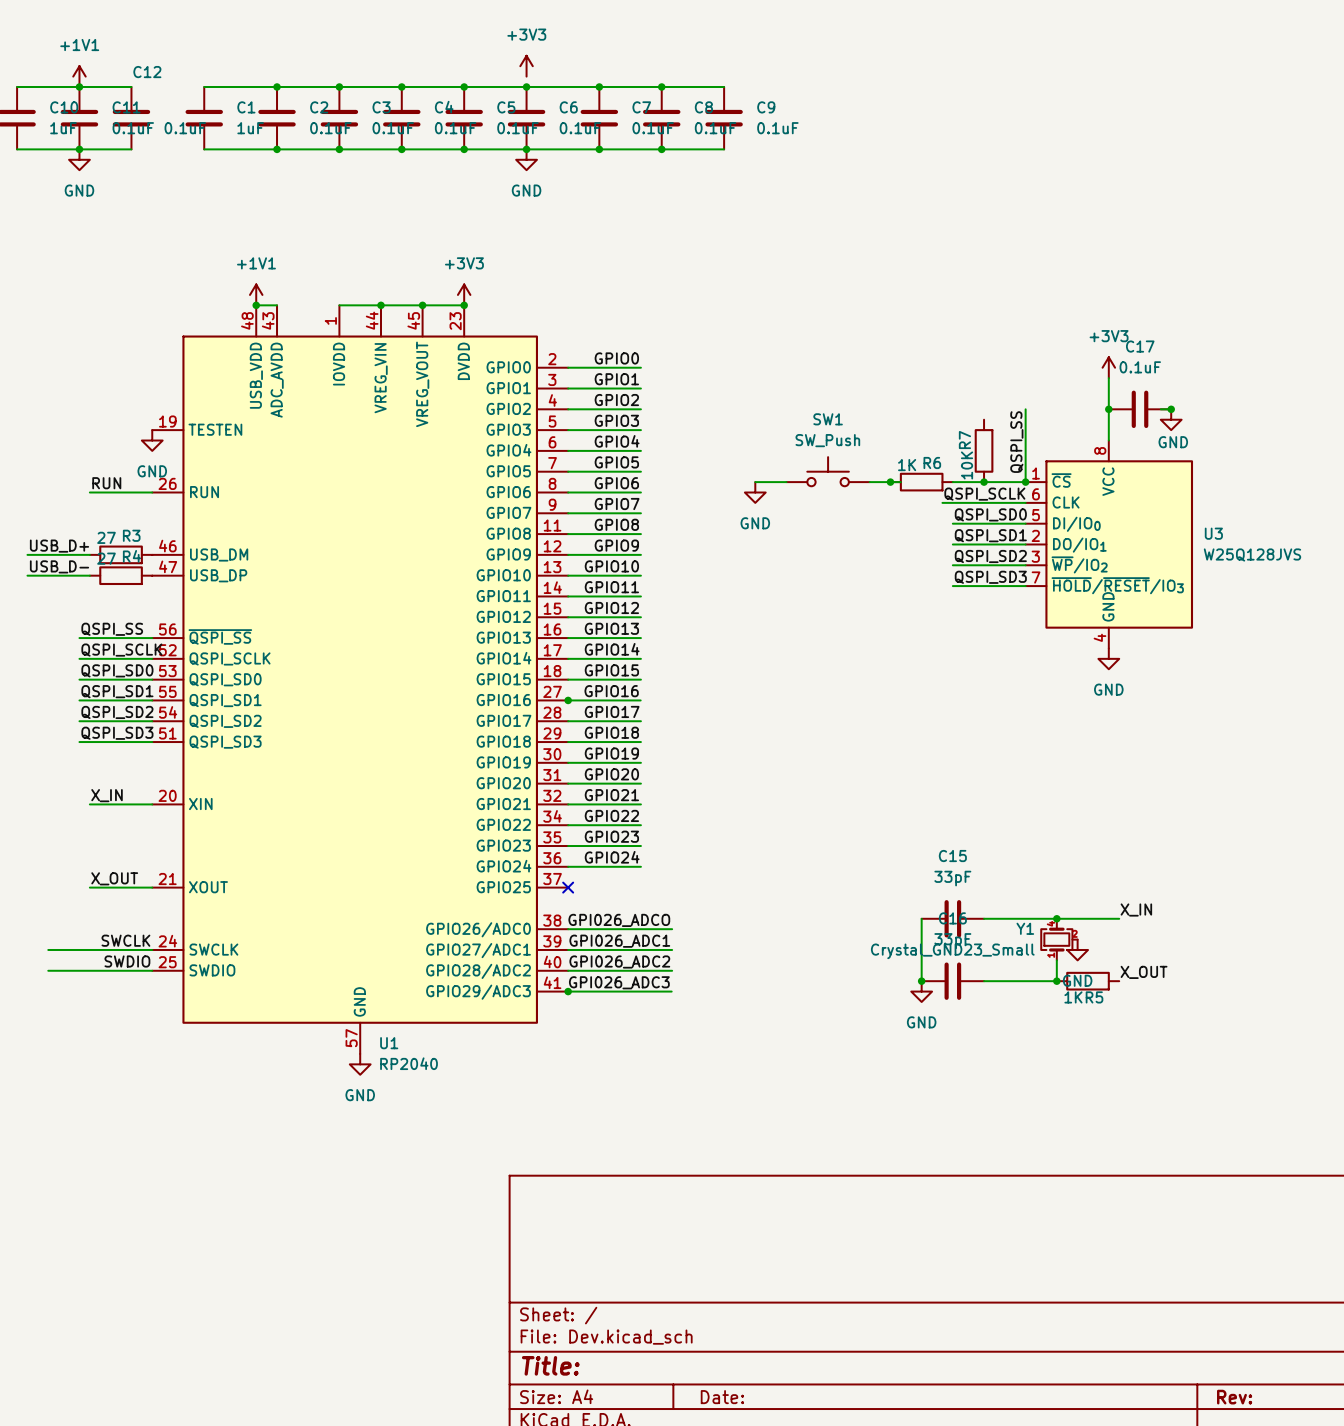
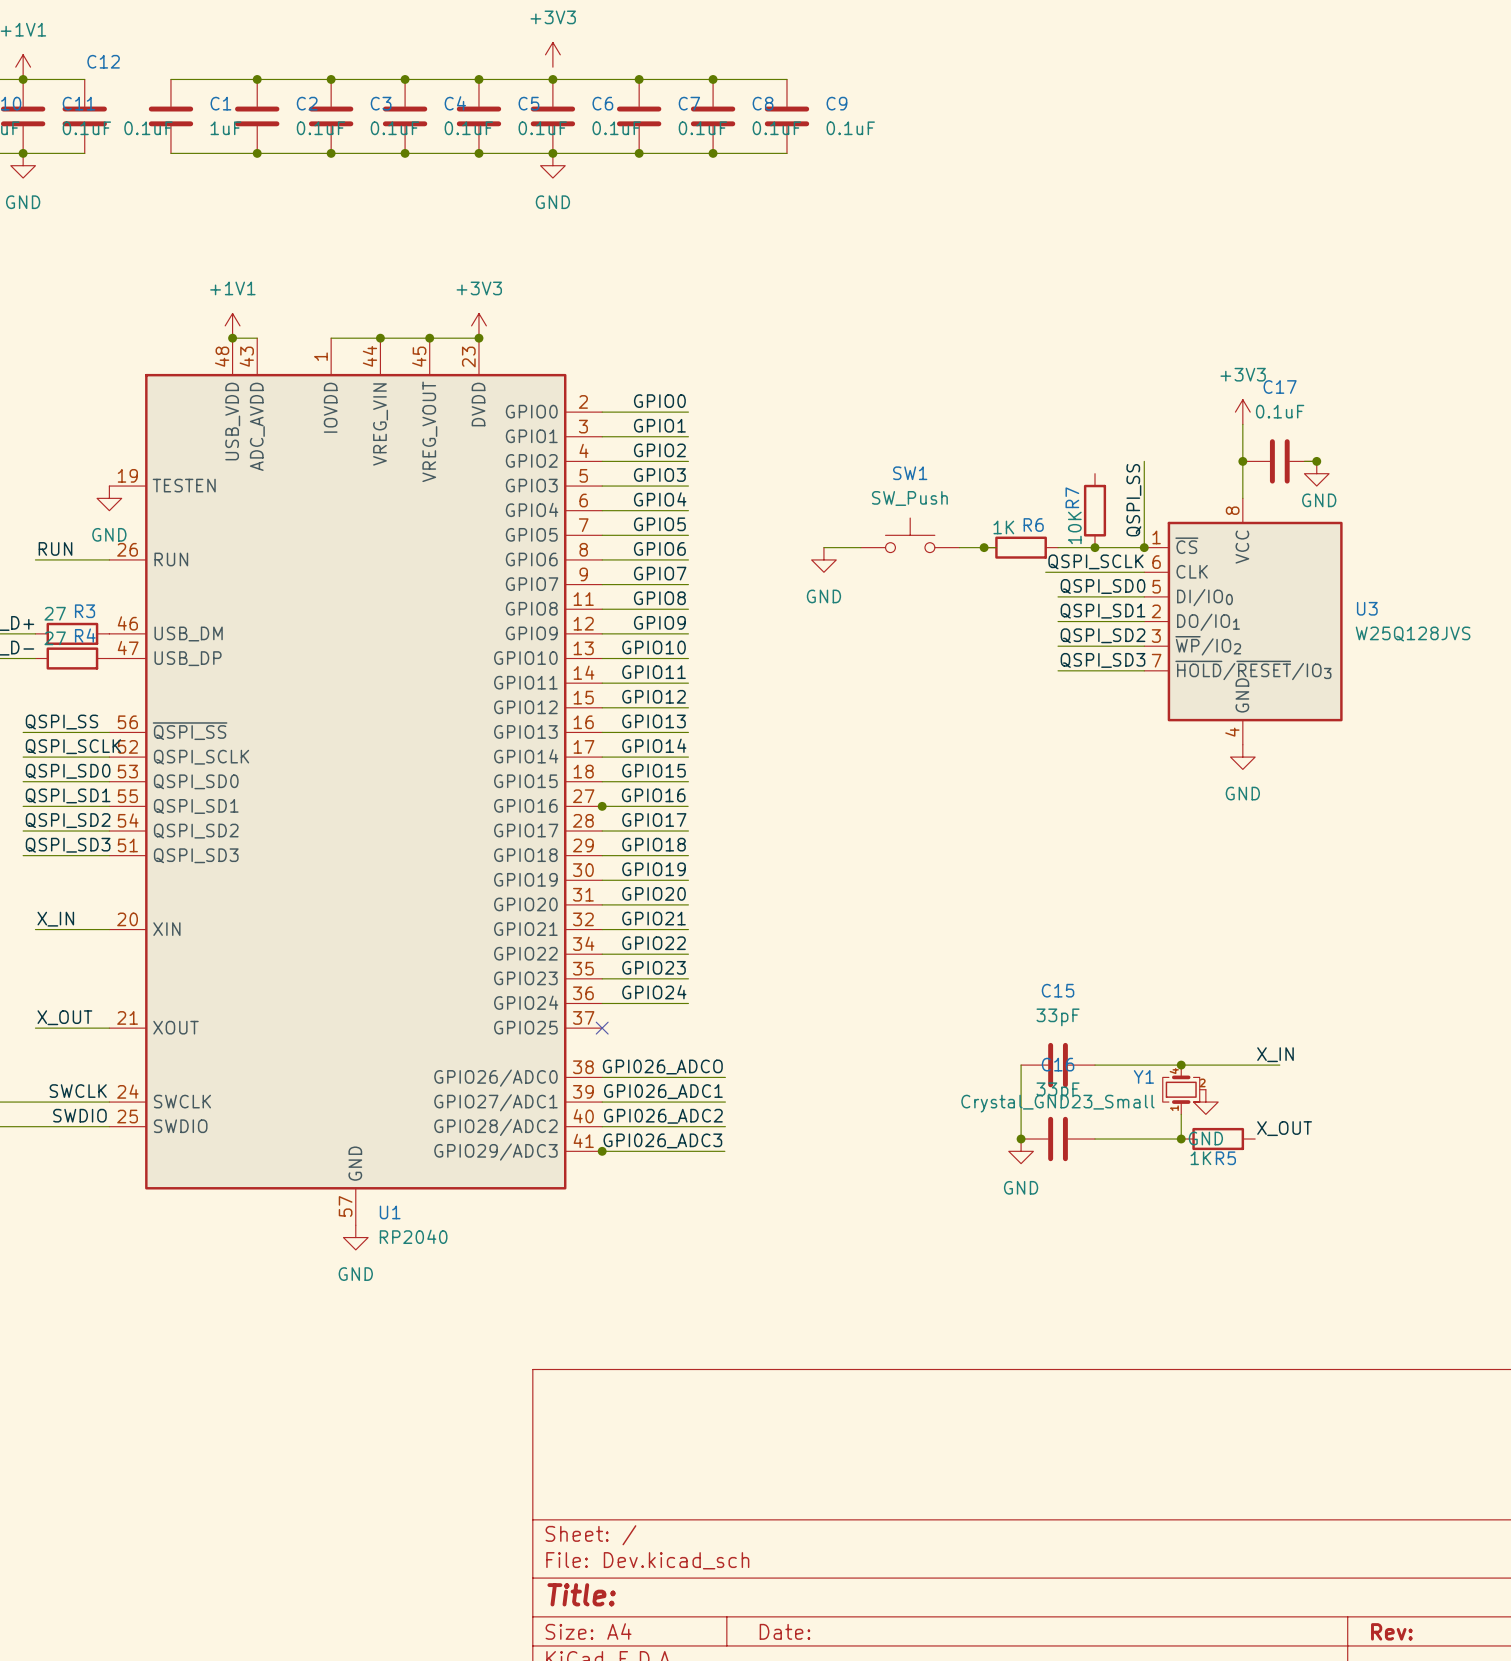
wire: none -> (1255, 1065) (1279, 1065)

